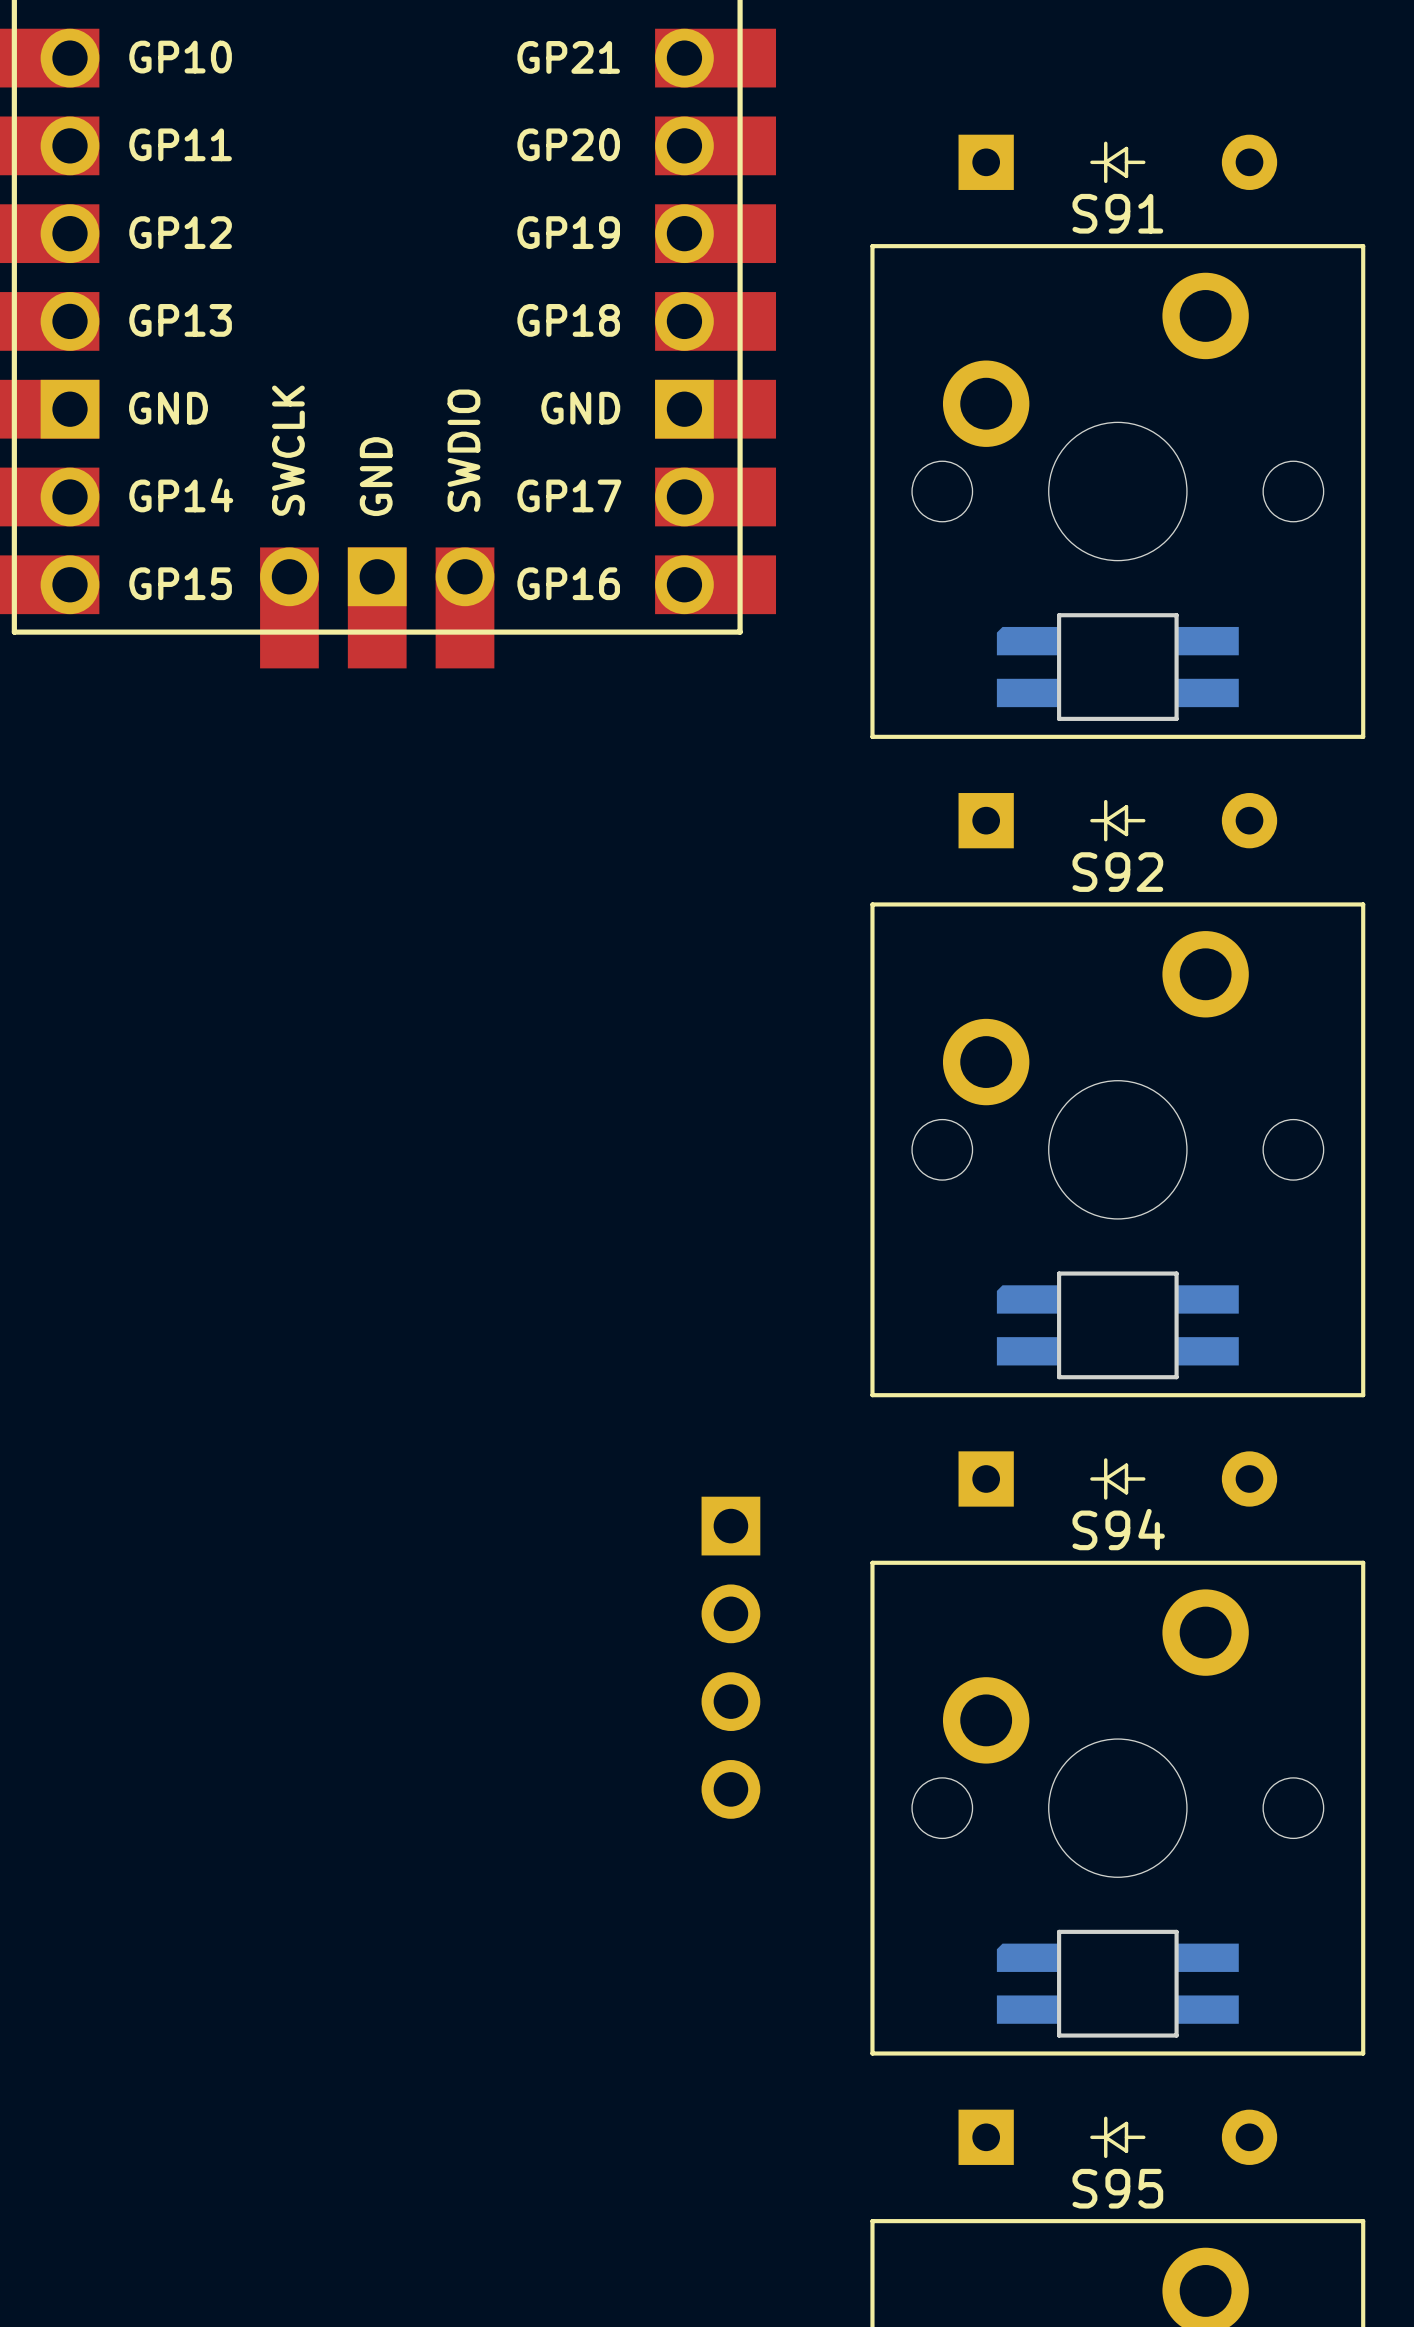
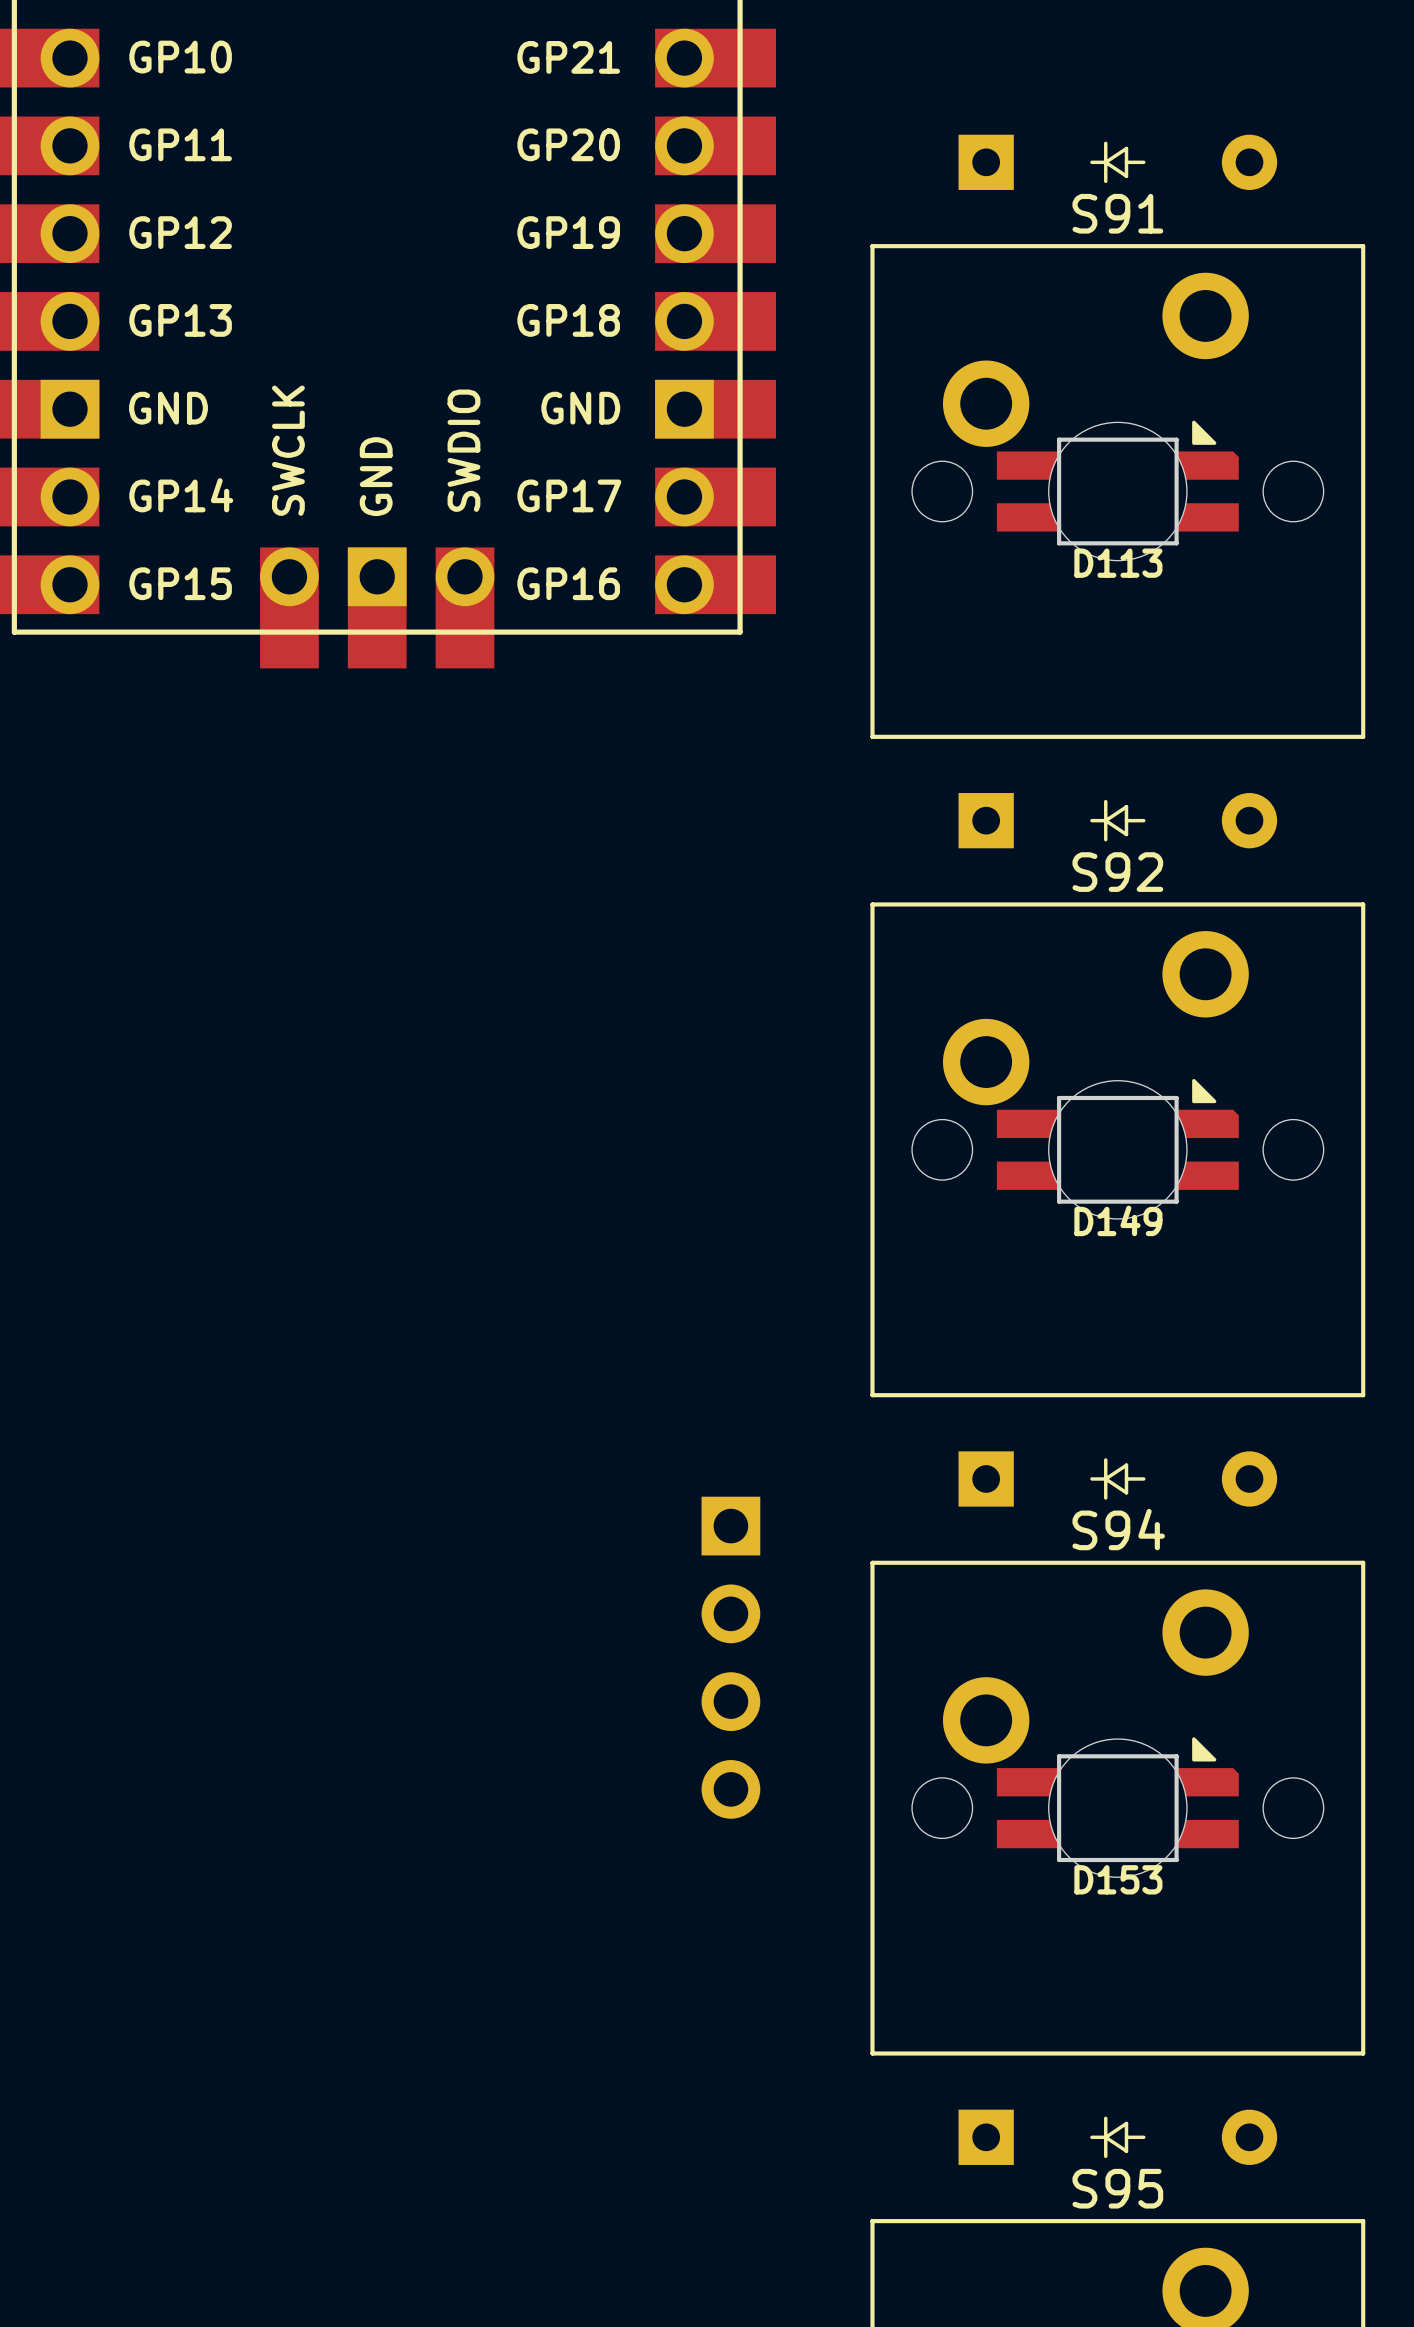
D113 side: bottom (1117, 667) -> top (1117, 483)
D149 side: bottom (1117, 1325) -> top (1117, 1141)
D153 side: bottom (1117, 1983) -> top (1117, 1799)

